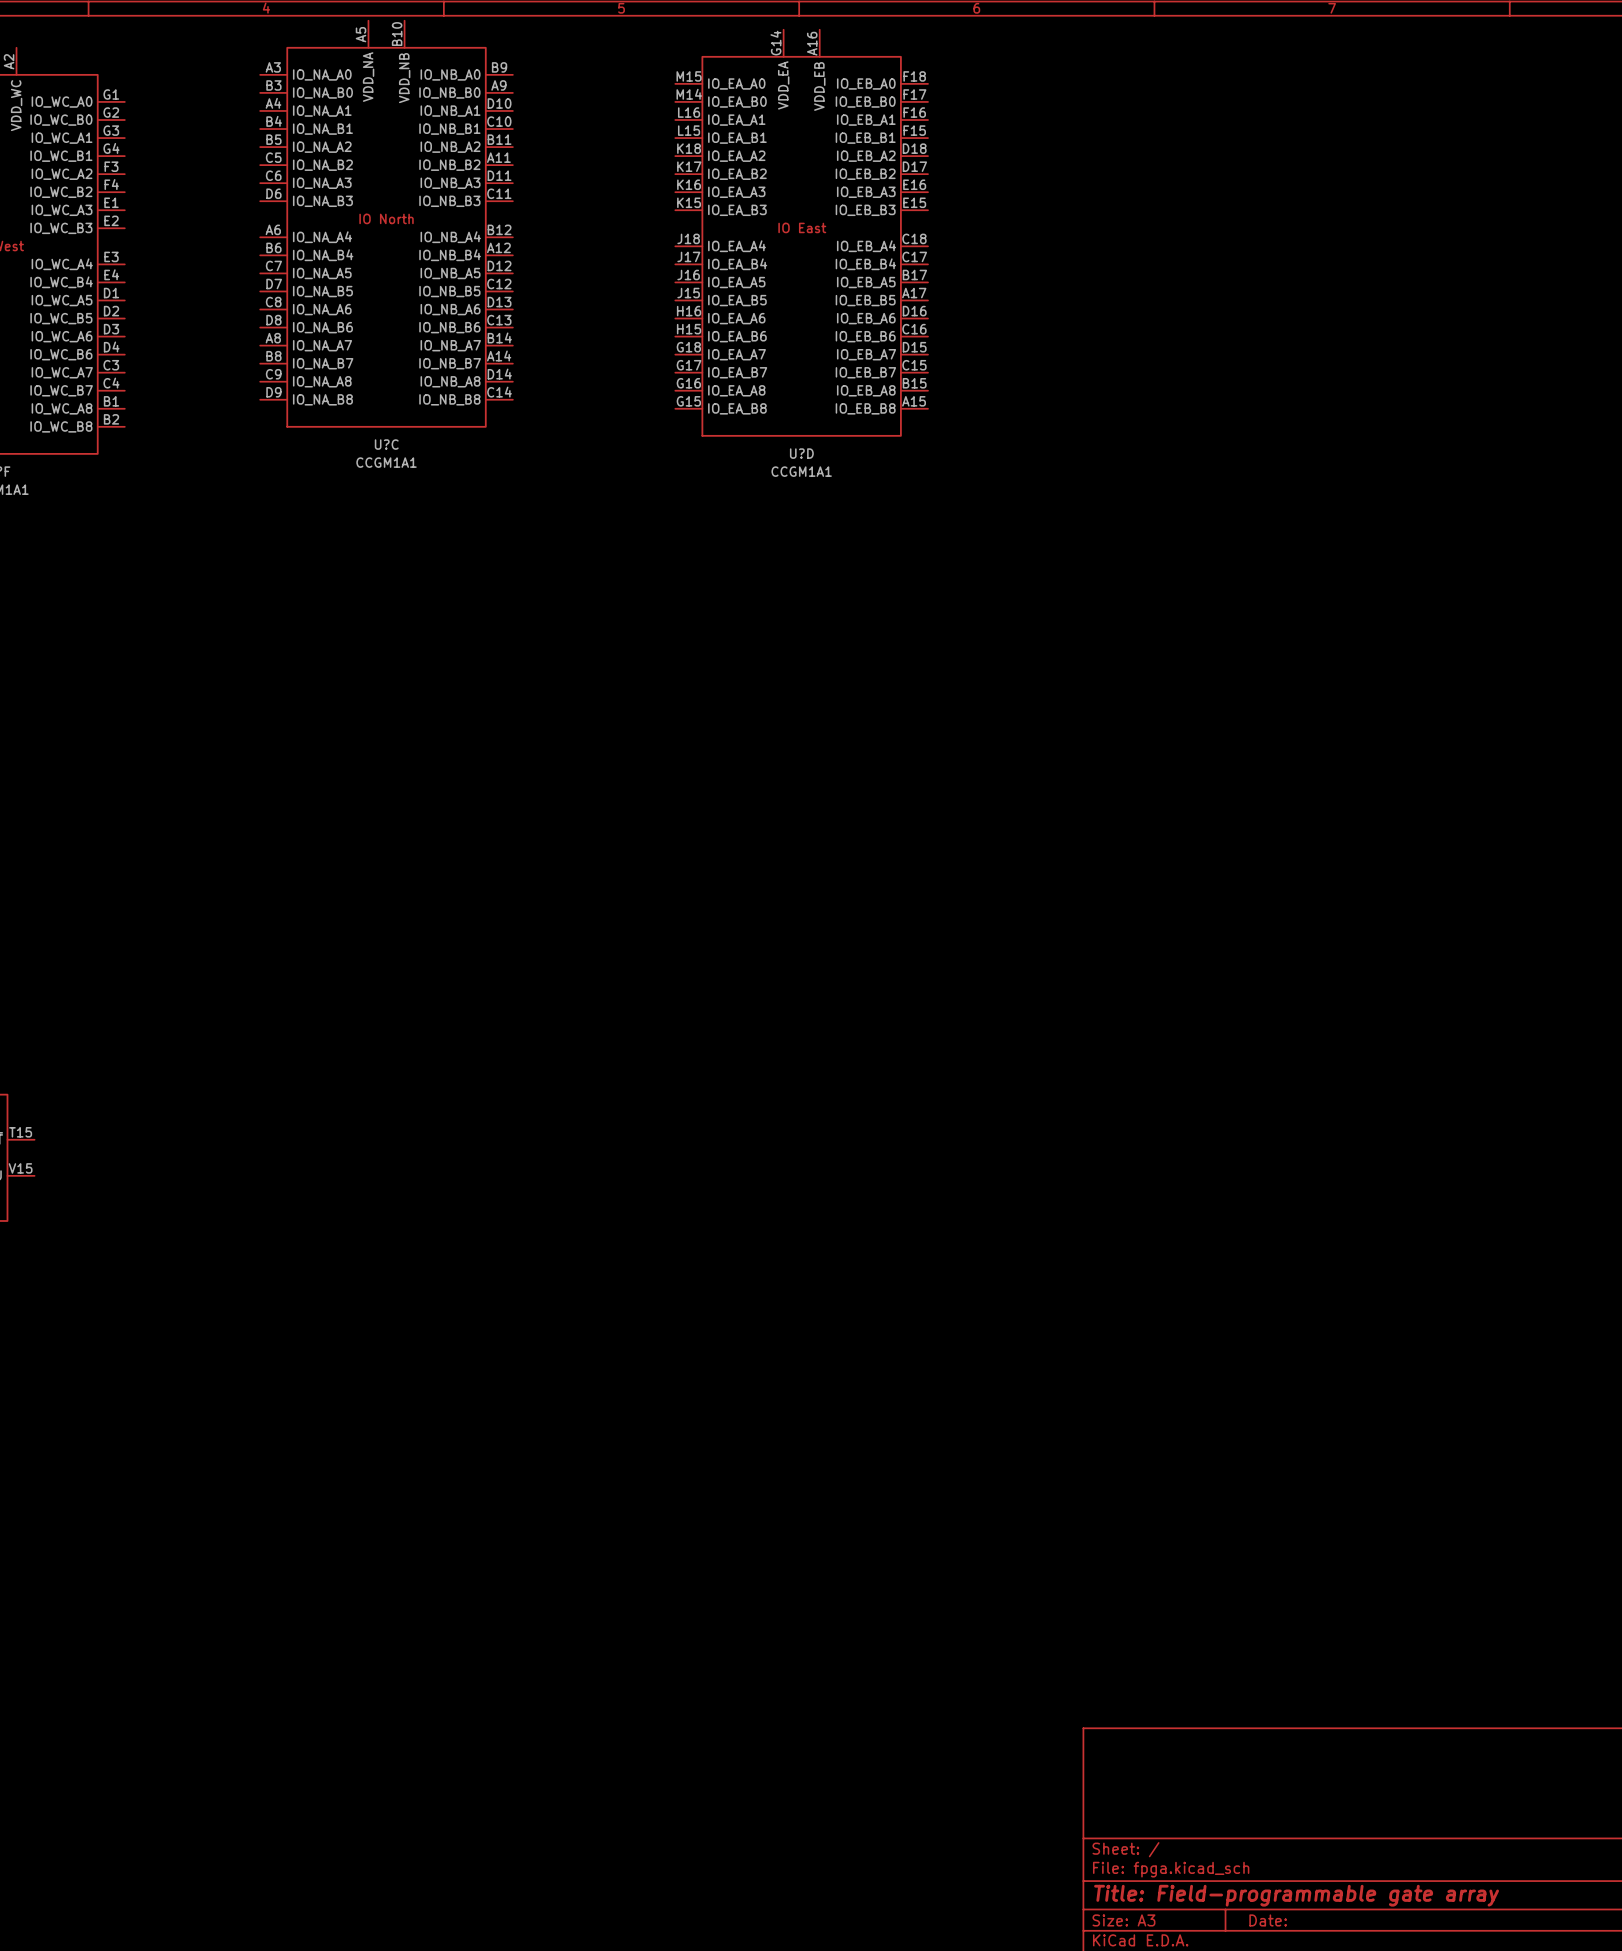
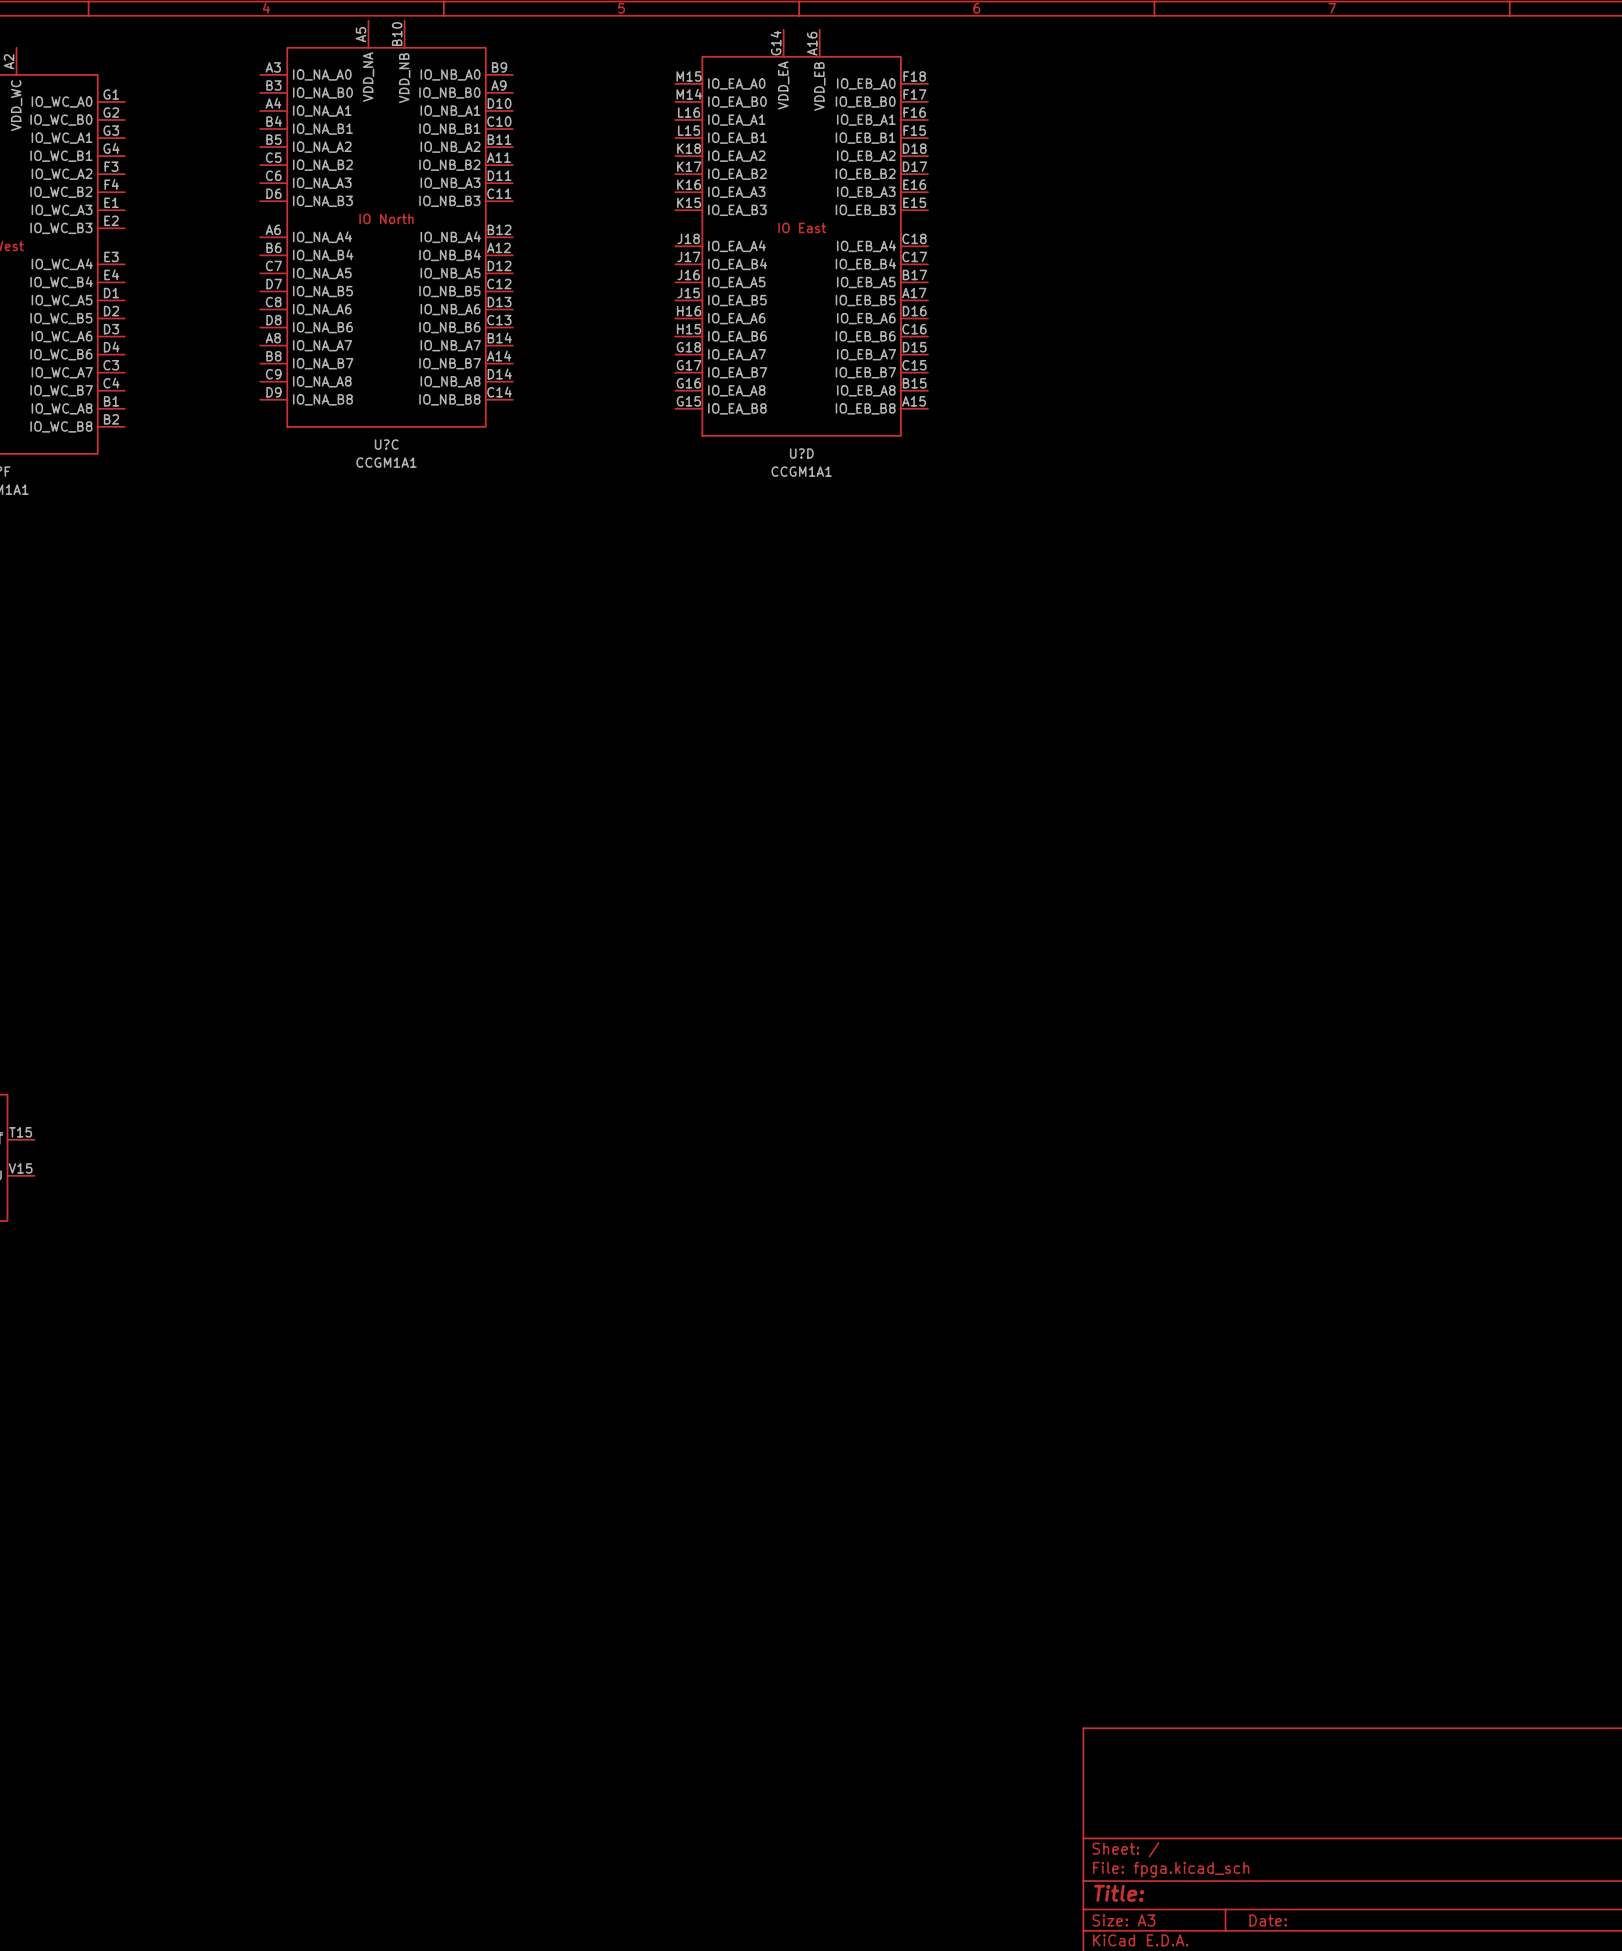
title block: Title: Field-programmable gate array (1296, 1895) -> Title: (1119, 1893)

